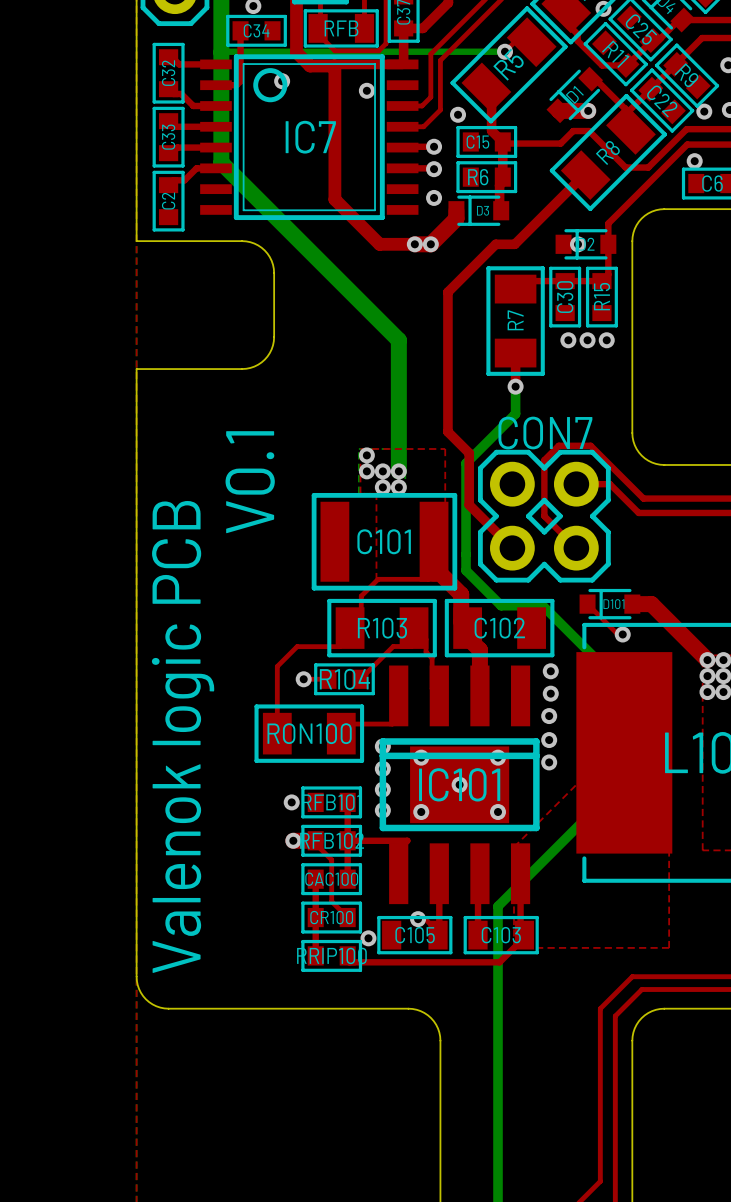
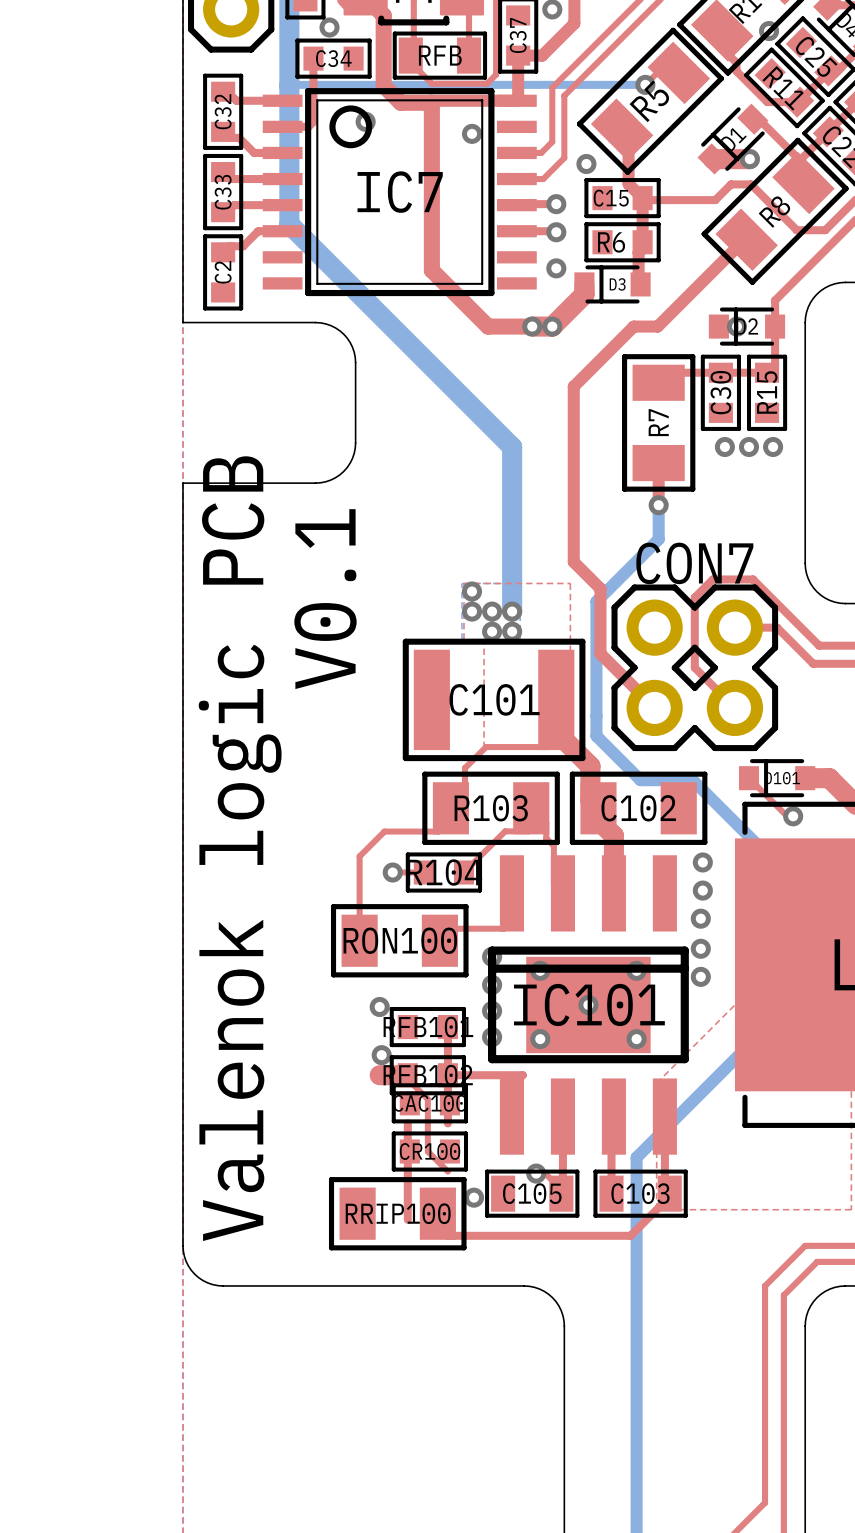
via position: (291, 802) -> (379, 1006)
via position: (293, 840) -> (381, 1055)
CAC100 position: (331, 879) -> (429, 1103)
CR100 position: (331, 917) -> (429, 1151)
RRIP100 footprint: [301, 939, 363, 972] -> [328, 1177, 467, 1251]
top track: (347, 955) (349, 962) (499, 962) -> (437, 1213) (428, 1216) (447, 1235) (630, 1235) (638, 1227)

